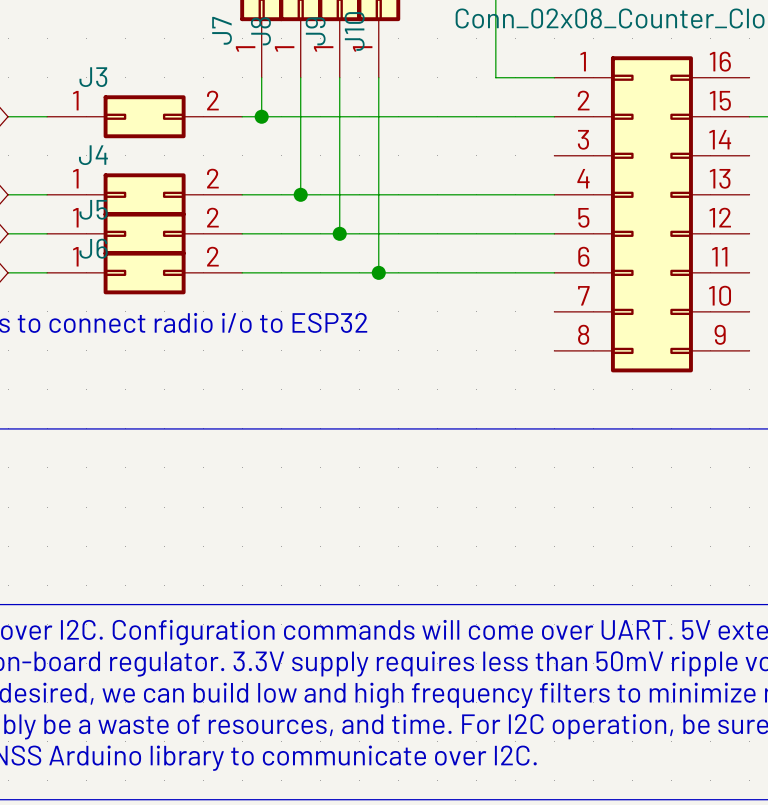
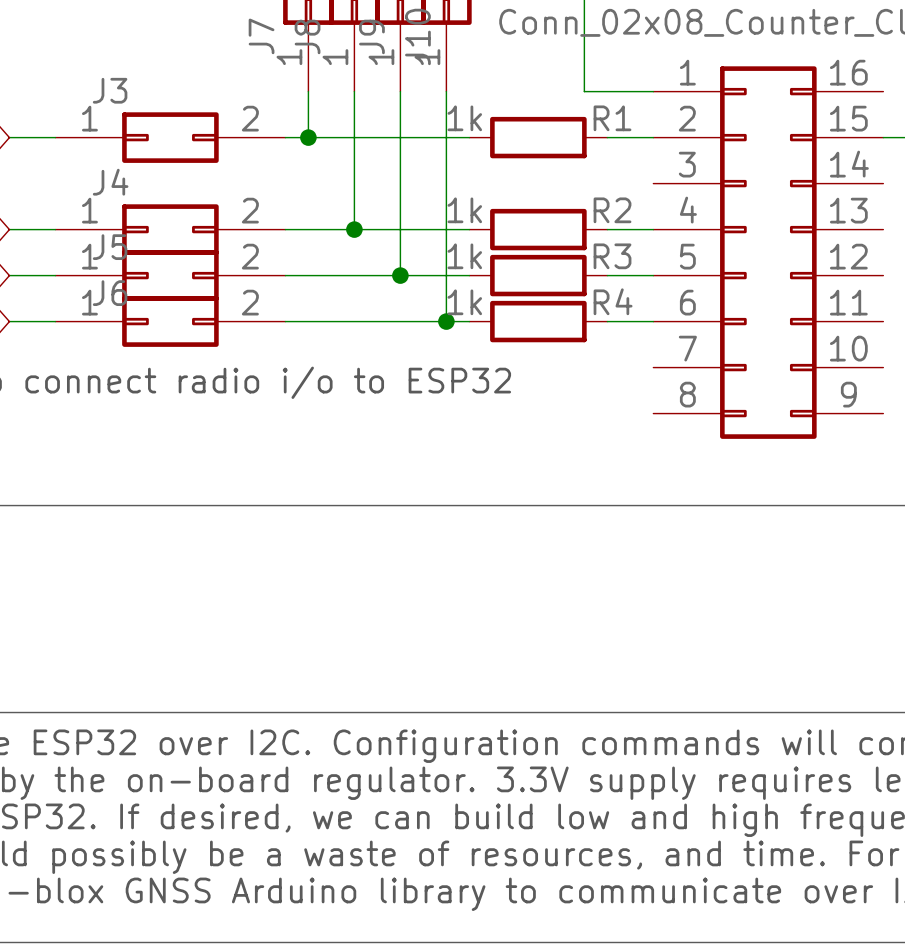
wire: (398, 116) (515, 116) -> none
R1: none -> 1k (538, 137)
wire: (398, 194) (515, 194) -> none
R2: none -> 1k (538, 229)
wire: (398, 233) (515, 233) -> none
R3: none -> 1k (538, 275)
wire: (398, 272) (515, 272) -> none
R4: none -> 1k (538, 321)

